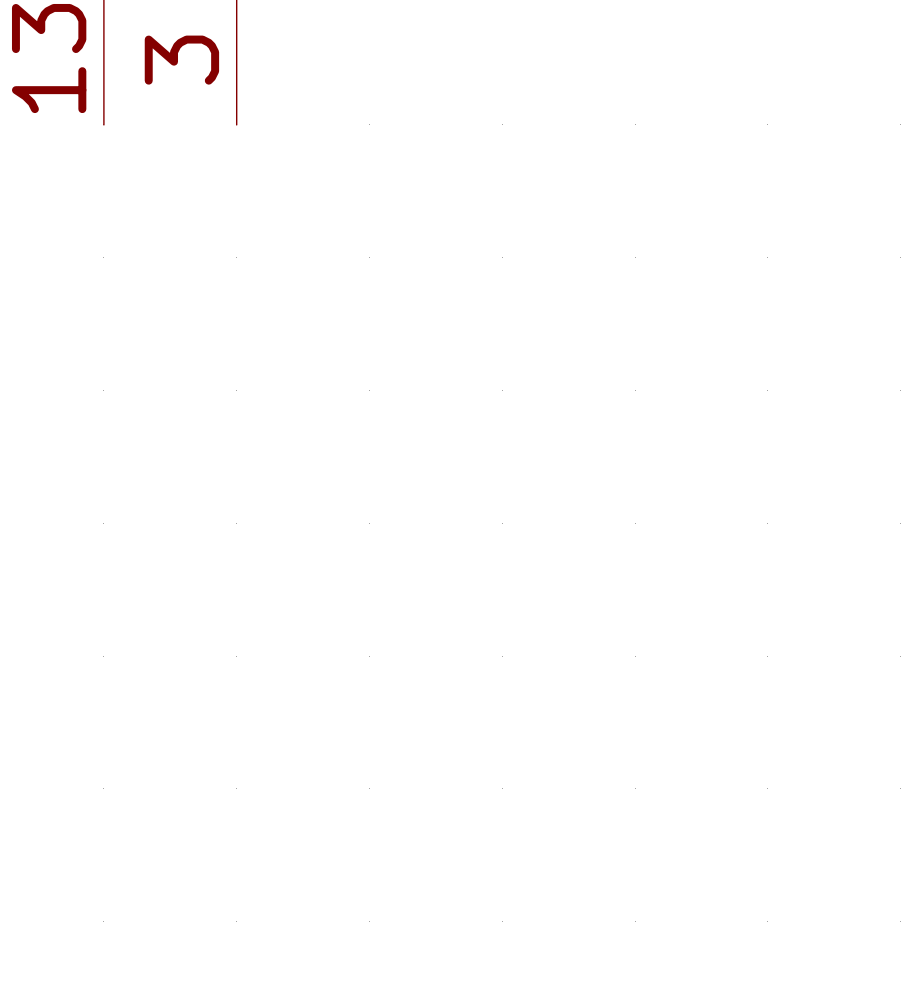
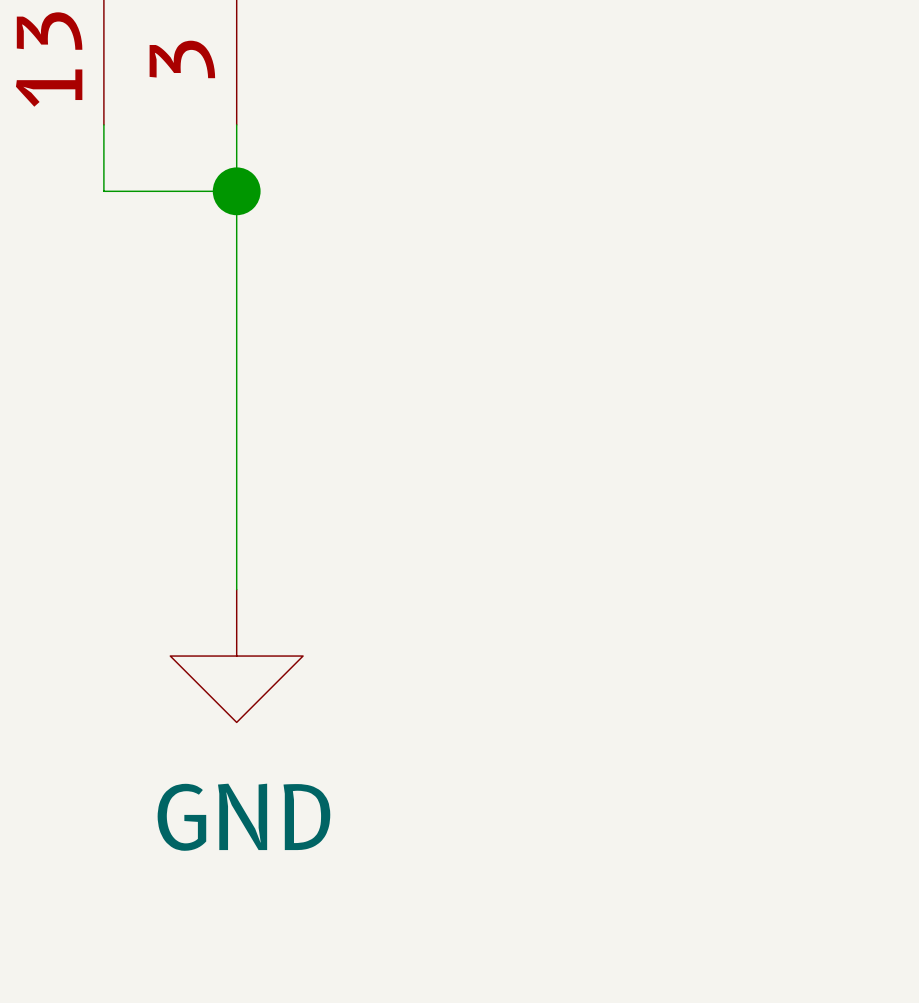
wire: none -> (103, 124) (103, 191) (236, 191)
wire: none -> (236, 124) (236, 589)
junction: none -> (236, 191)
power symbol: none -> GND (236, 656)

